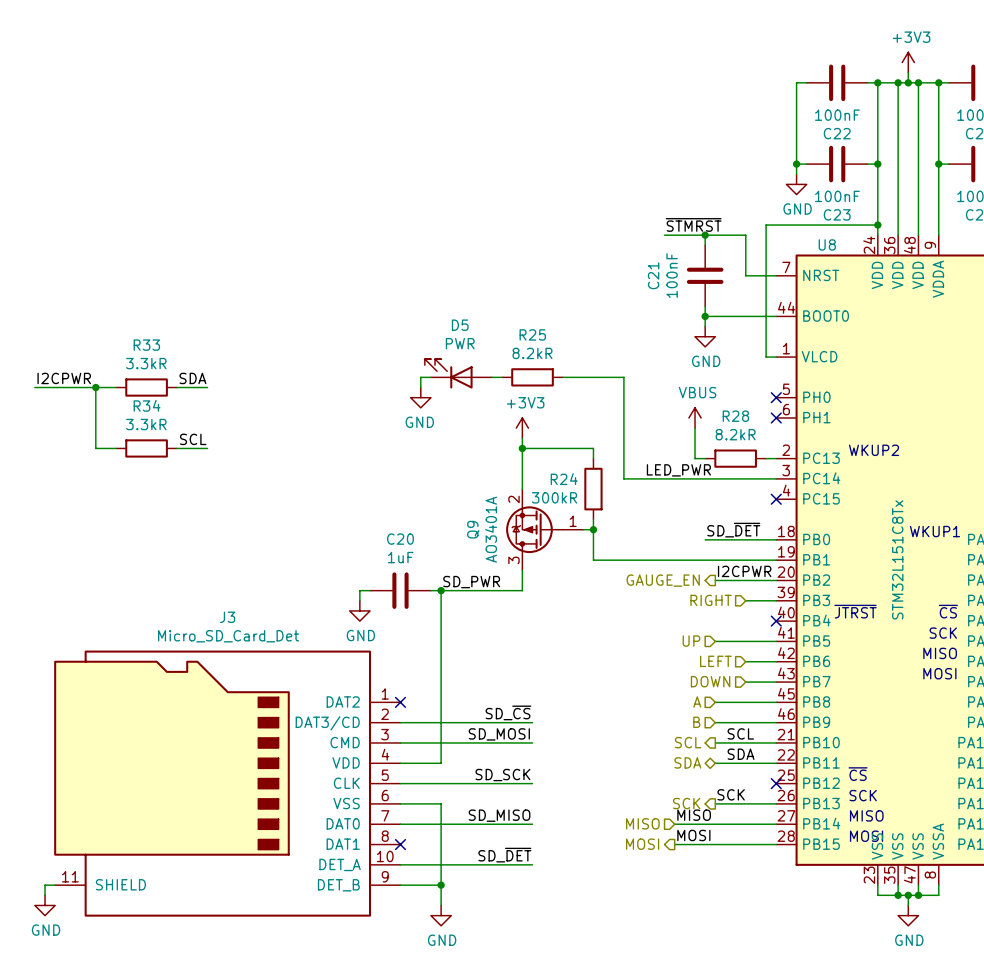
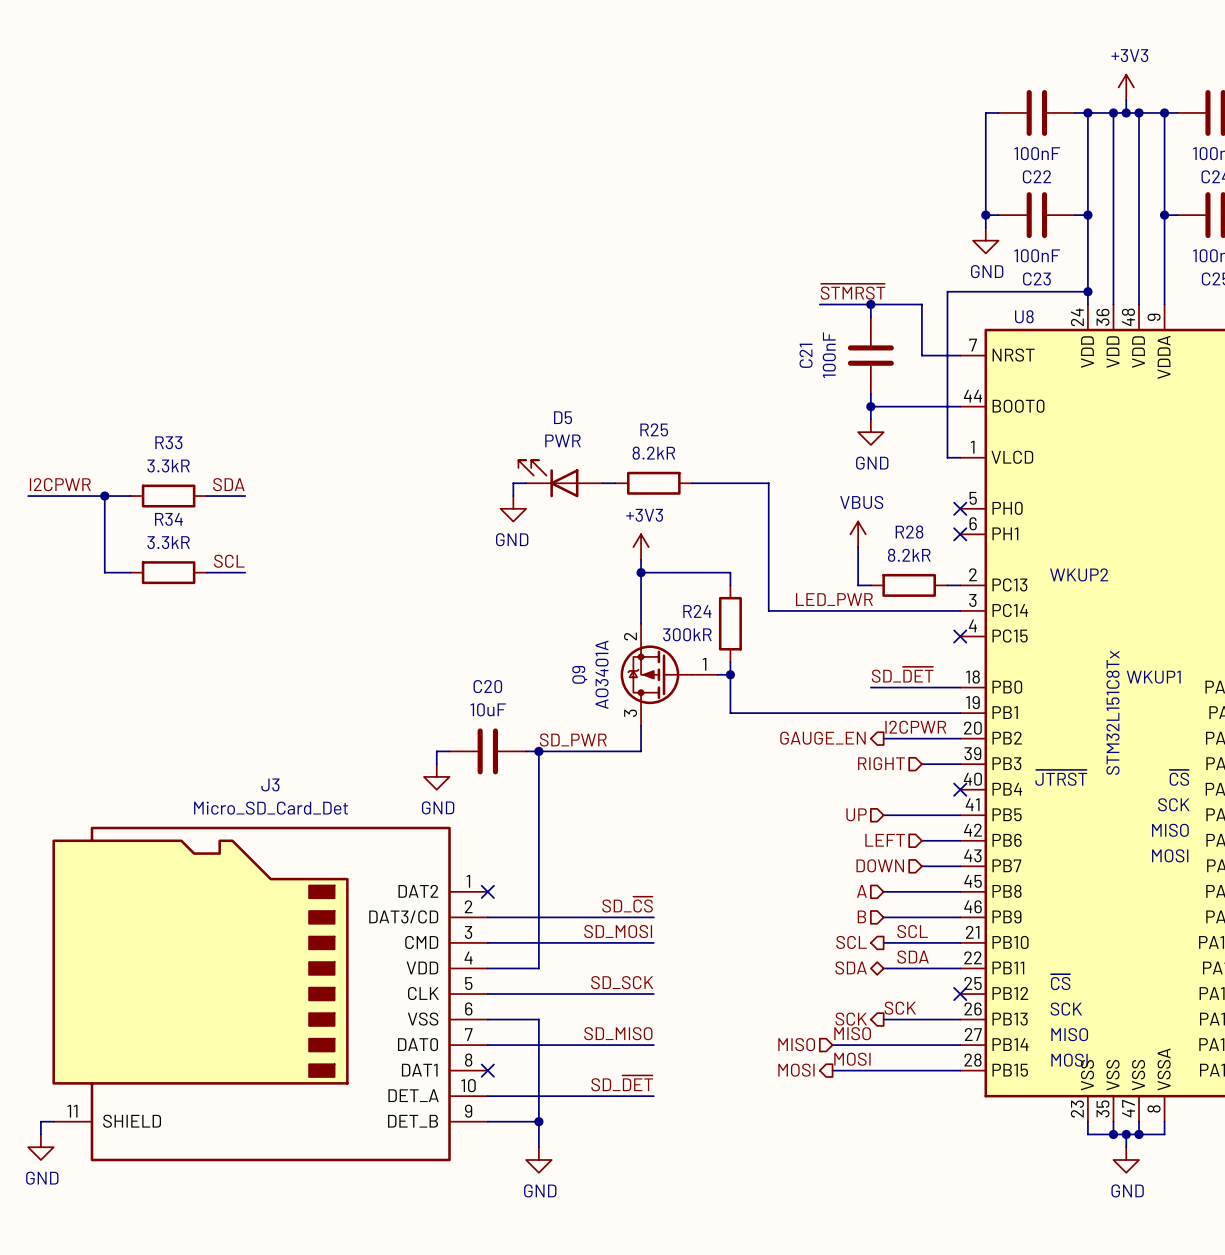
C20 value: 1uF (400, 557) -> 10uF (488, 709)

